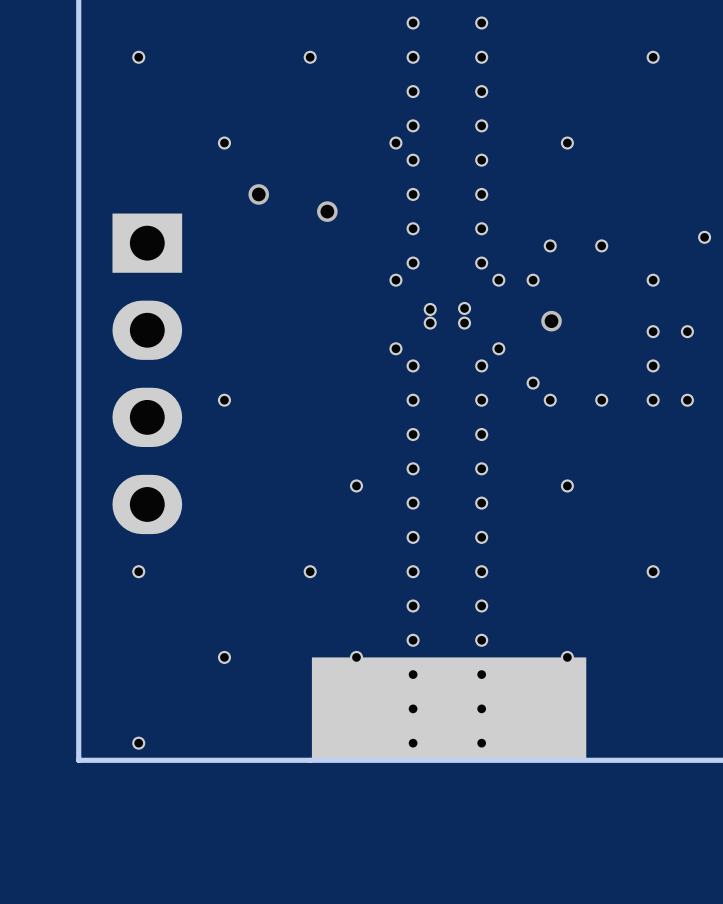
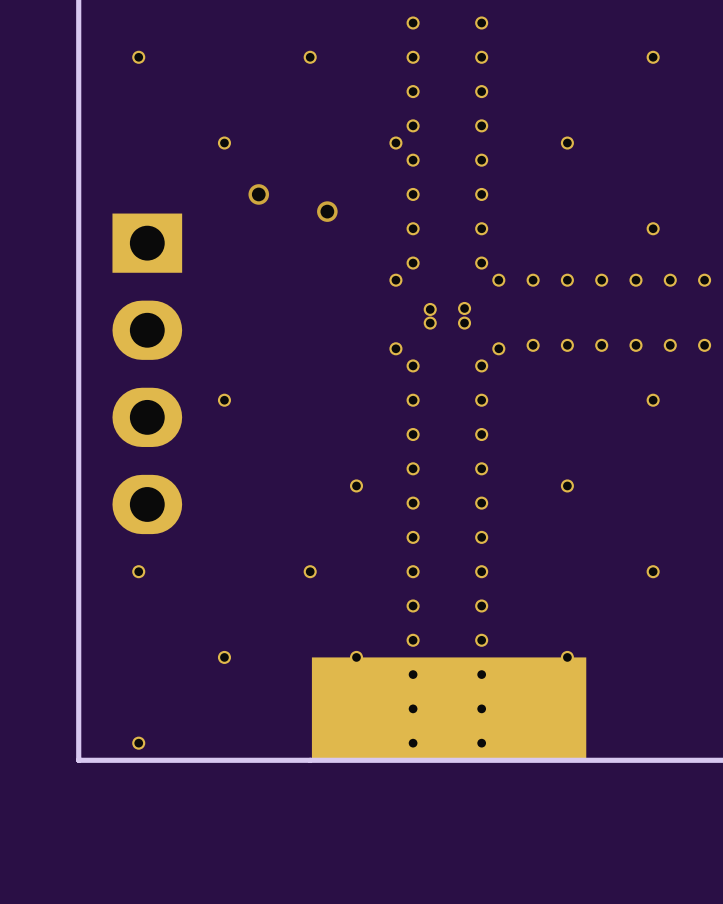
part: none -> (653, 228)
part: (704, 237) -> none
part: (550, 245) -> none
part: (601, 245) -> none
part: none -> (567, 280)
part: none -> (601, 280)
part: none -> (635, 280)
part: (653, 280) -> none
part: none -> (670, 280)
part: none -> (704, 280)
via: (551, 321) -> none
part: (653, 331) -> none
part: (687, 331) -> none
part: none -> (533, 345)
part: none -> (567, 345)
part: none -> (601, 345)
part: none -> (635, 345)
part: none -> (670, 345)
part: none -> (704, 345)
part: (653, 365) -> none
part: (533, 383) -> none
part: (550, 400) -> none
part: (601, 400) -> none
part: (687, 400) -> none

